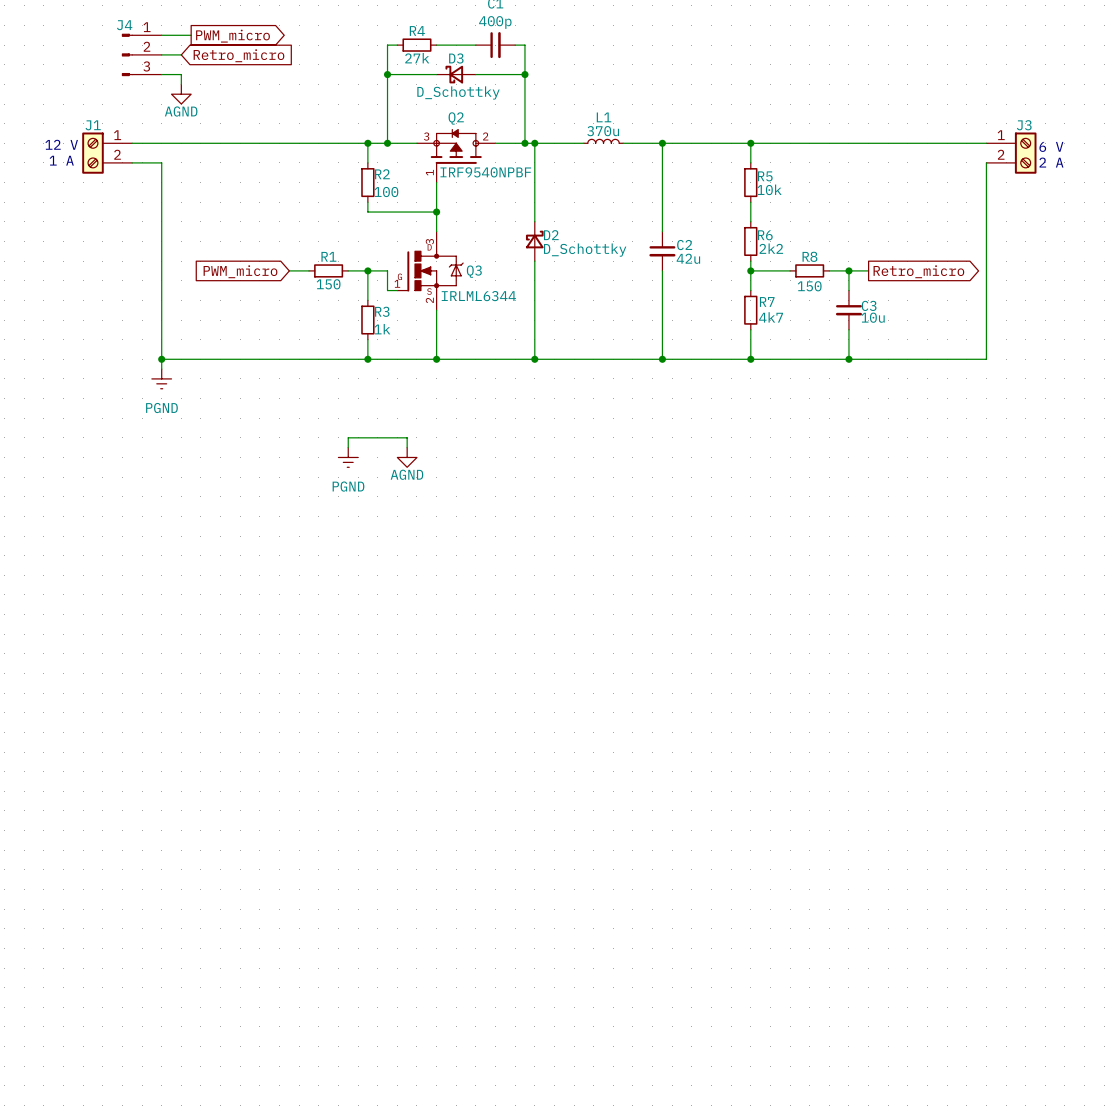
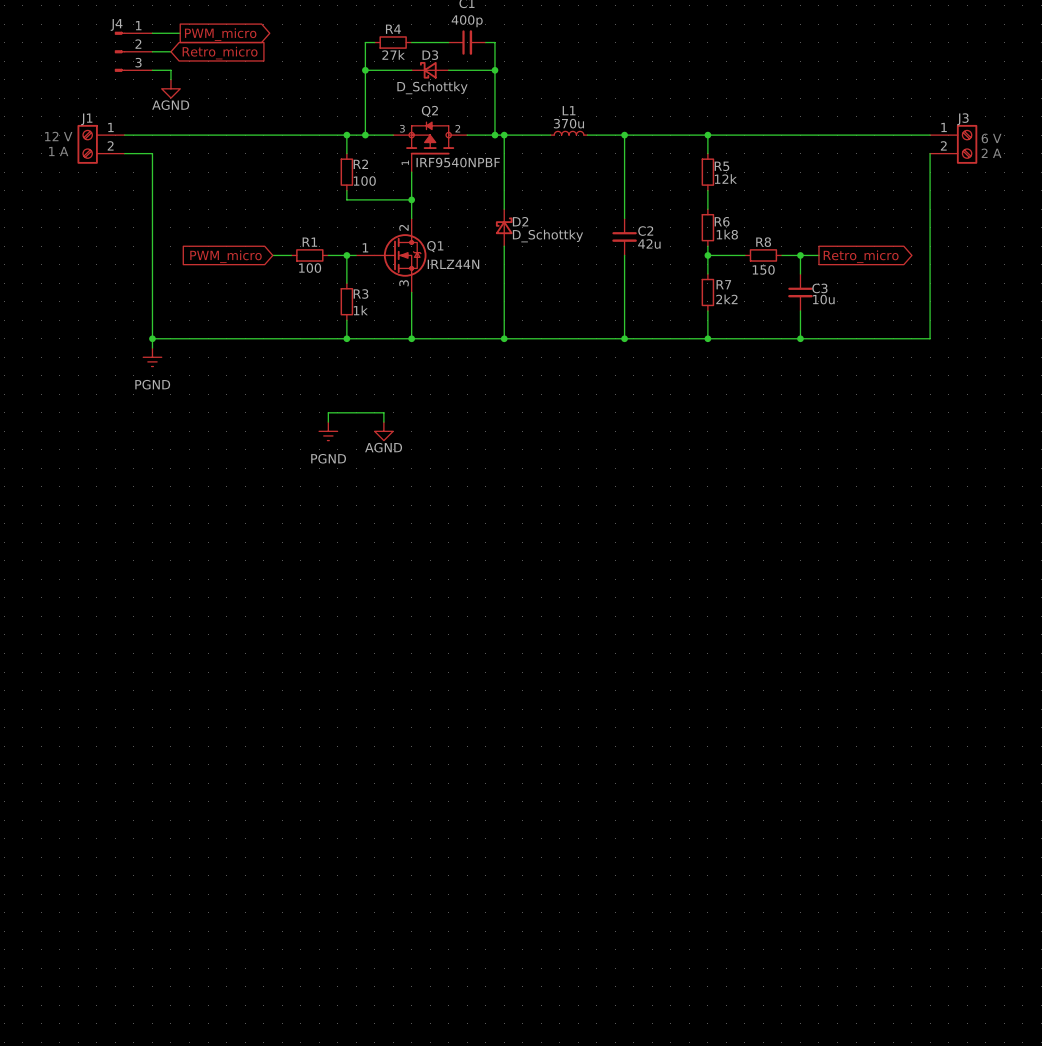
R5 value: 10k (769, 189) -> 12k (725, 178)
R6 value: 2k2 (771, 248) -> 1k8 (727, 234)
wire: (377, 270) (387, 270) (387, 290) (397, 290) -> none
Q1: none -> IRLZ44N (391, 255)
Q3: IRLML6344 (430, 270) -> none
R1 value: 150 (328, 284) -> 100 (310, 268)
R7 value: 4k7 (771, 317) -> 2k2 (726, 299)

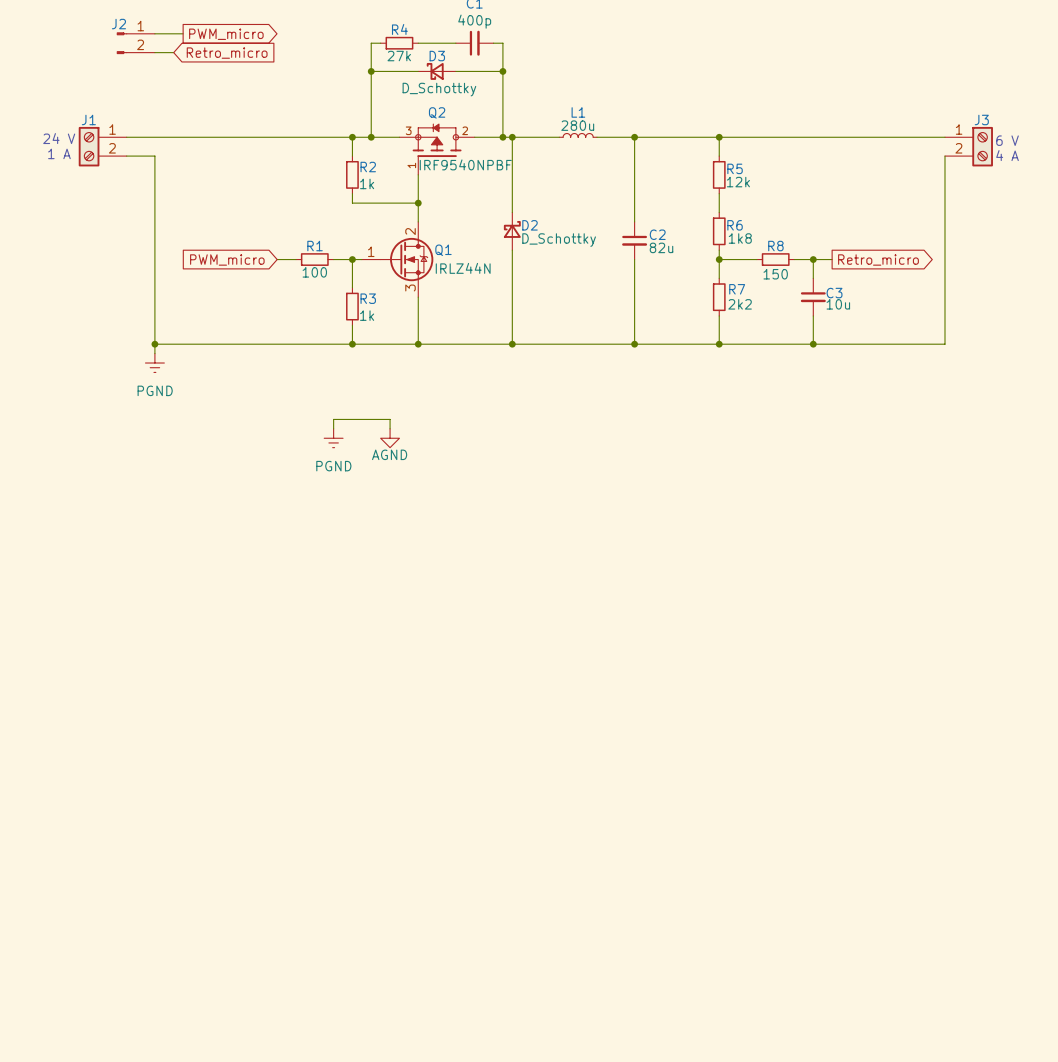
J2: none -> (135, 43)
J4: (133, 51) -> none
wire: (152, 70) (170, 70) (170, 79) -> none
power symbol: AGND (170, 88) -> none
L1 value: 370u (568, 123) -> 280u (577, 125)
text: 12 V (58, 136) -> 24 V (59, 138)
text: 2 A (991, 153) -> 4 A (1007, 155)
R2 value: 100 (364, 181) -> 1k (367, 183)
C2 value: 42u (649, 244) -> 82u (661, 247)

